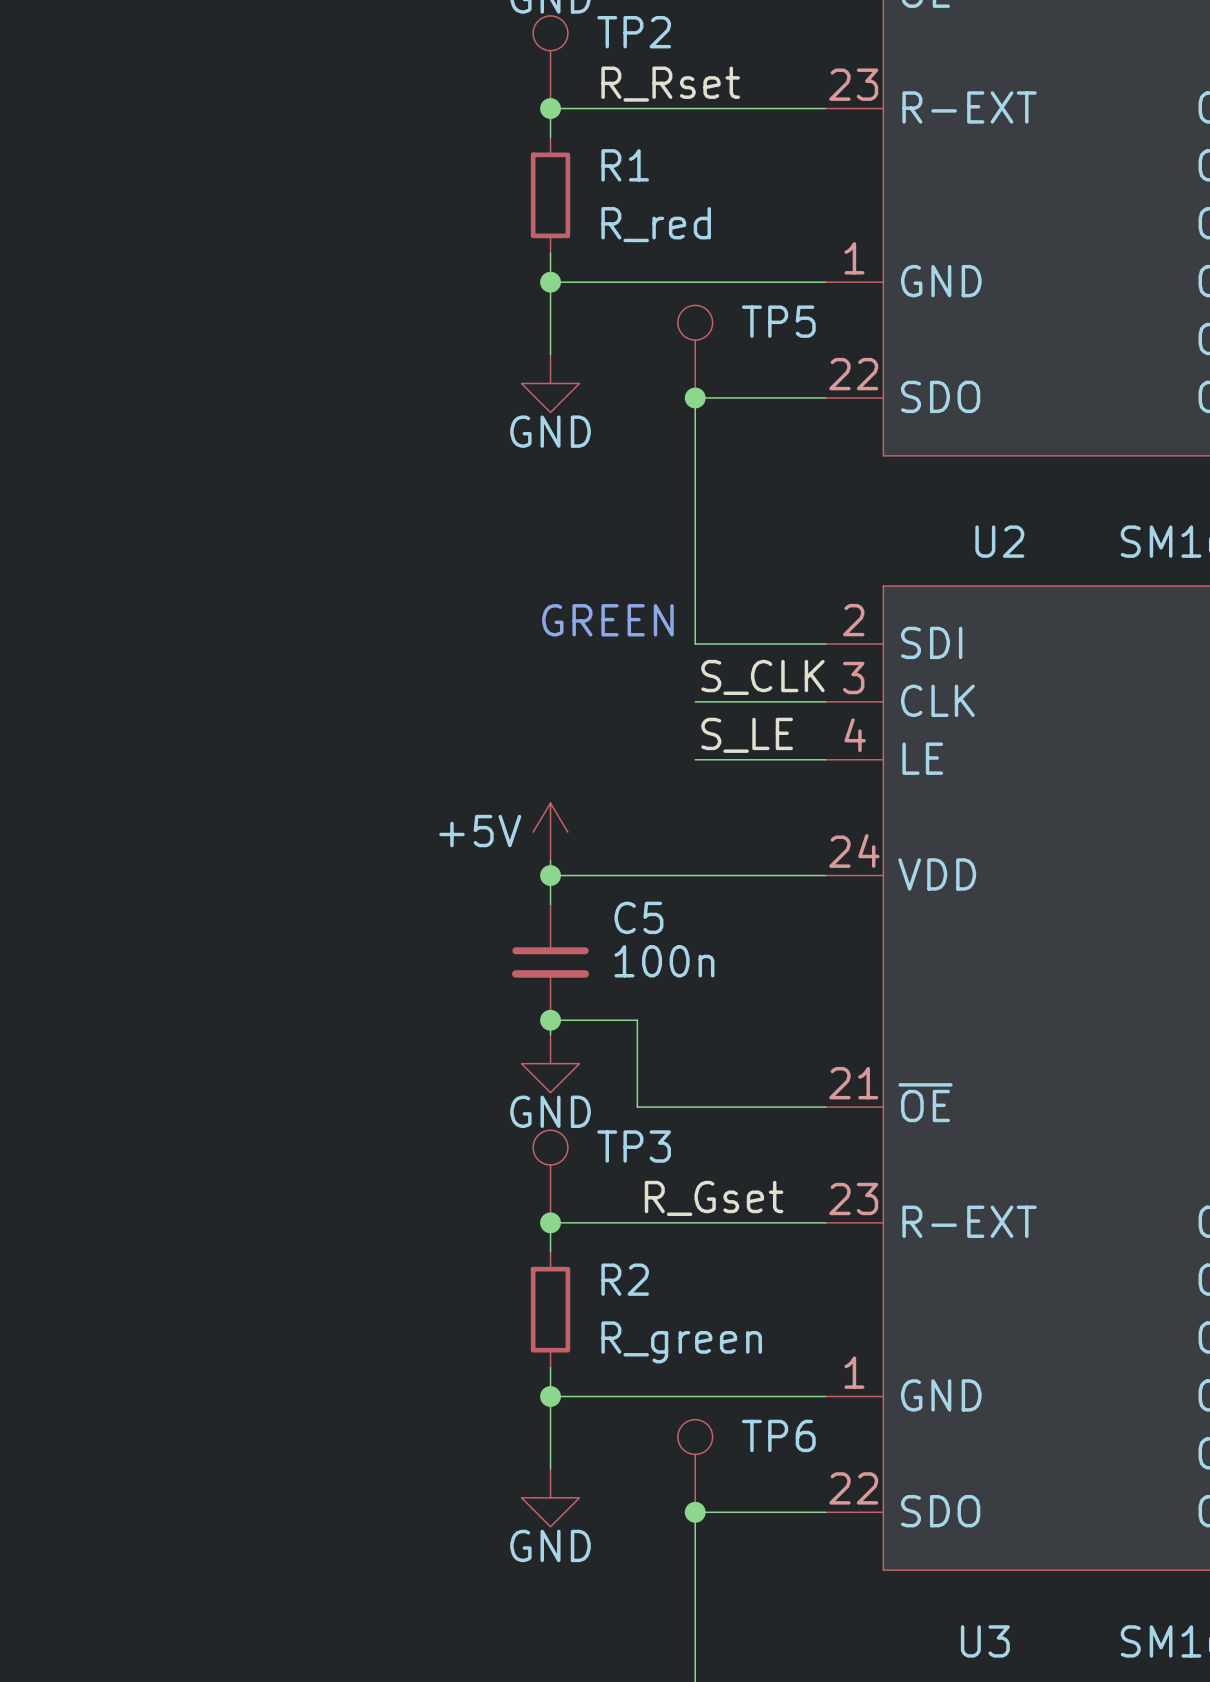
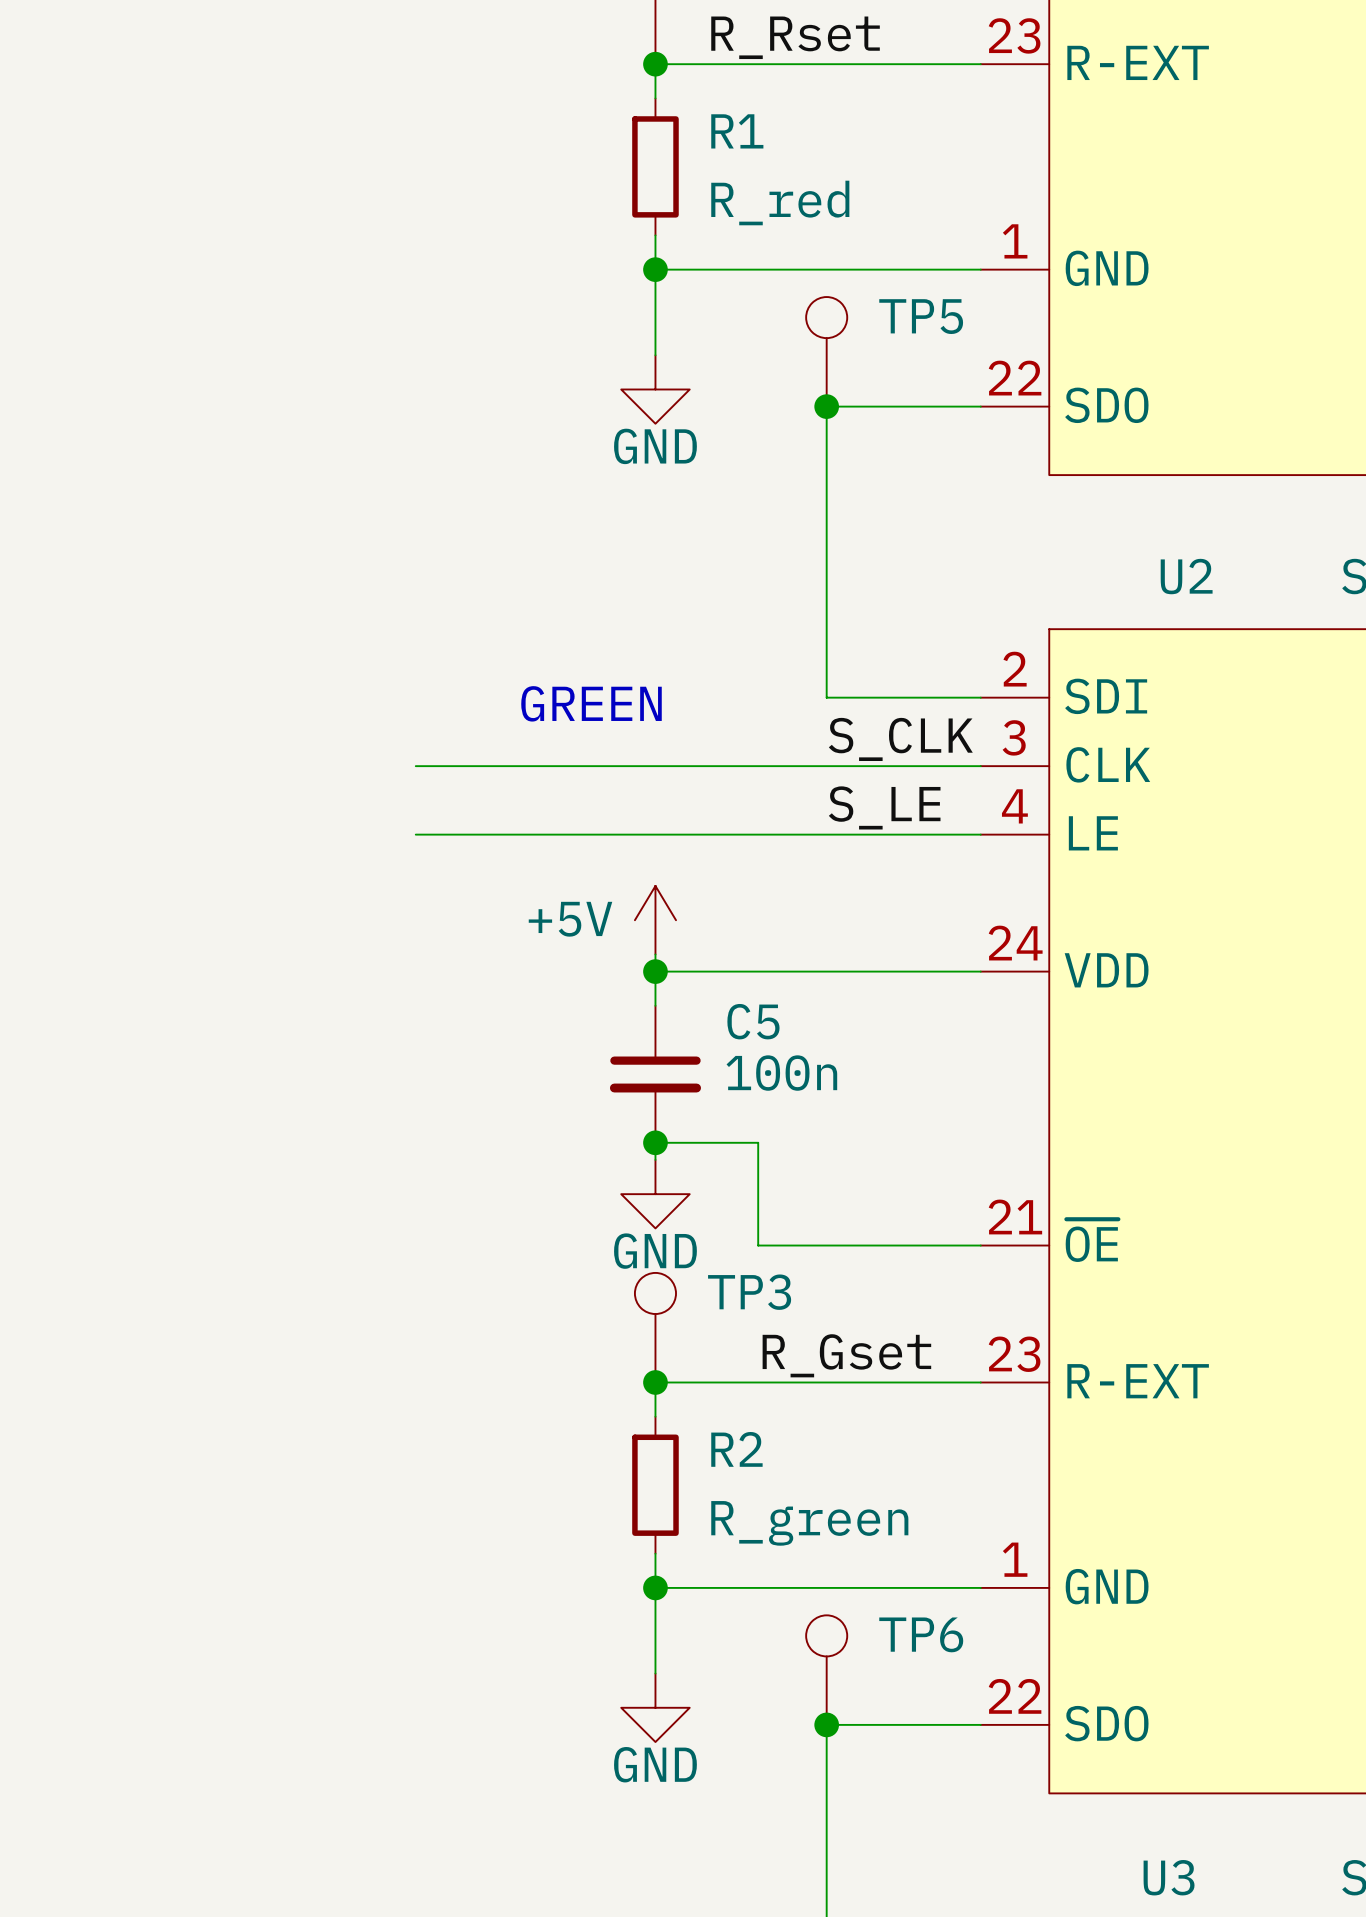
text position: GREEN (607, 620) -> GREEN (591, 703)
wire: none -> (415, 766) (826, 766)
wire: none -> (415, 834) (826, 834)

